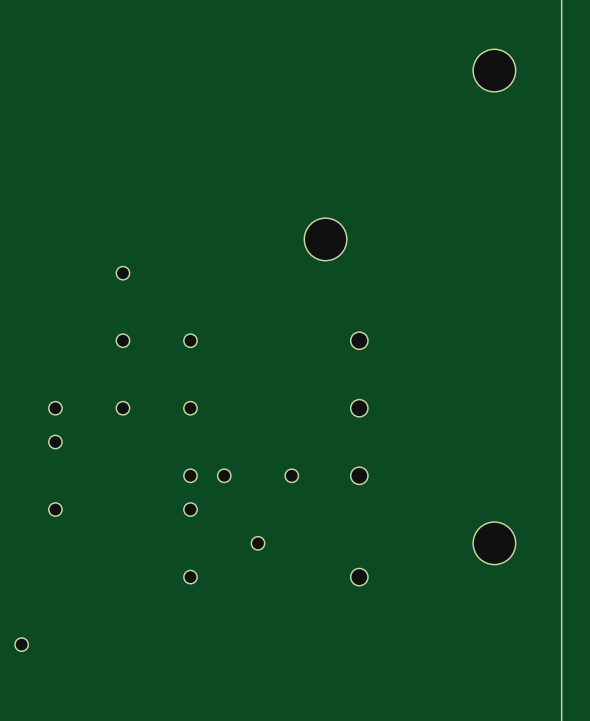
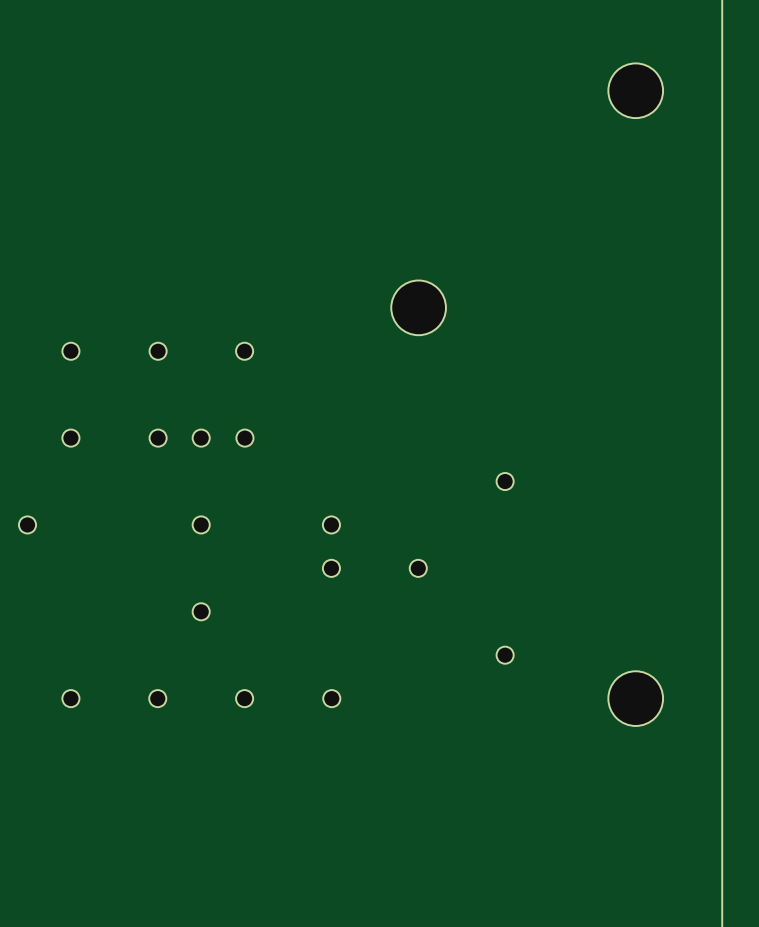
hole: none -> (70, 351)
hole: none -> (244, 351)
hole: none -> (70, 438)
hole: none -> (201, 438)
hole: (359, 340) -> none
hole: none -> (505, 481)
hole: none -> (27, 524)
hole: (55, 408) -> none
hole: (122, 408) -> none
hole: none -> (201, 524)
hole: (190, 408) -> none
hole: none -> (331, 524)
hole: (359, 408) -> none
hole: (55, 442) -> none
hole: none -> (331, 568)
hole: none -> (418, 568)
hole: none -> (201, 611)
hole: (190, 475) -> none
hole: (224, 475) -> none
hole: (291, 475) -> none
hole: (359, 475) -> none
hole position: (55, 509) -> (70, 698)
hole: (190, 509) -> none
hole: none -> (505, 655)
hole: none -> (157, 698)
hole: none -> (244, 698)
hole: (190, 577) -> none
hole: (359, 577) -> none
hole: (21, 644) -> none

